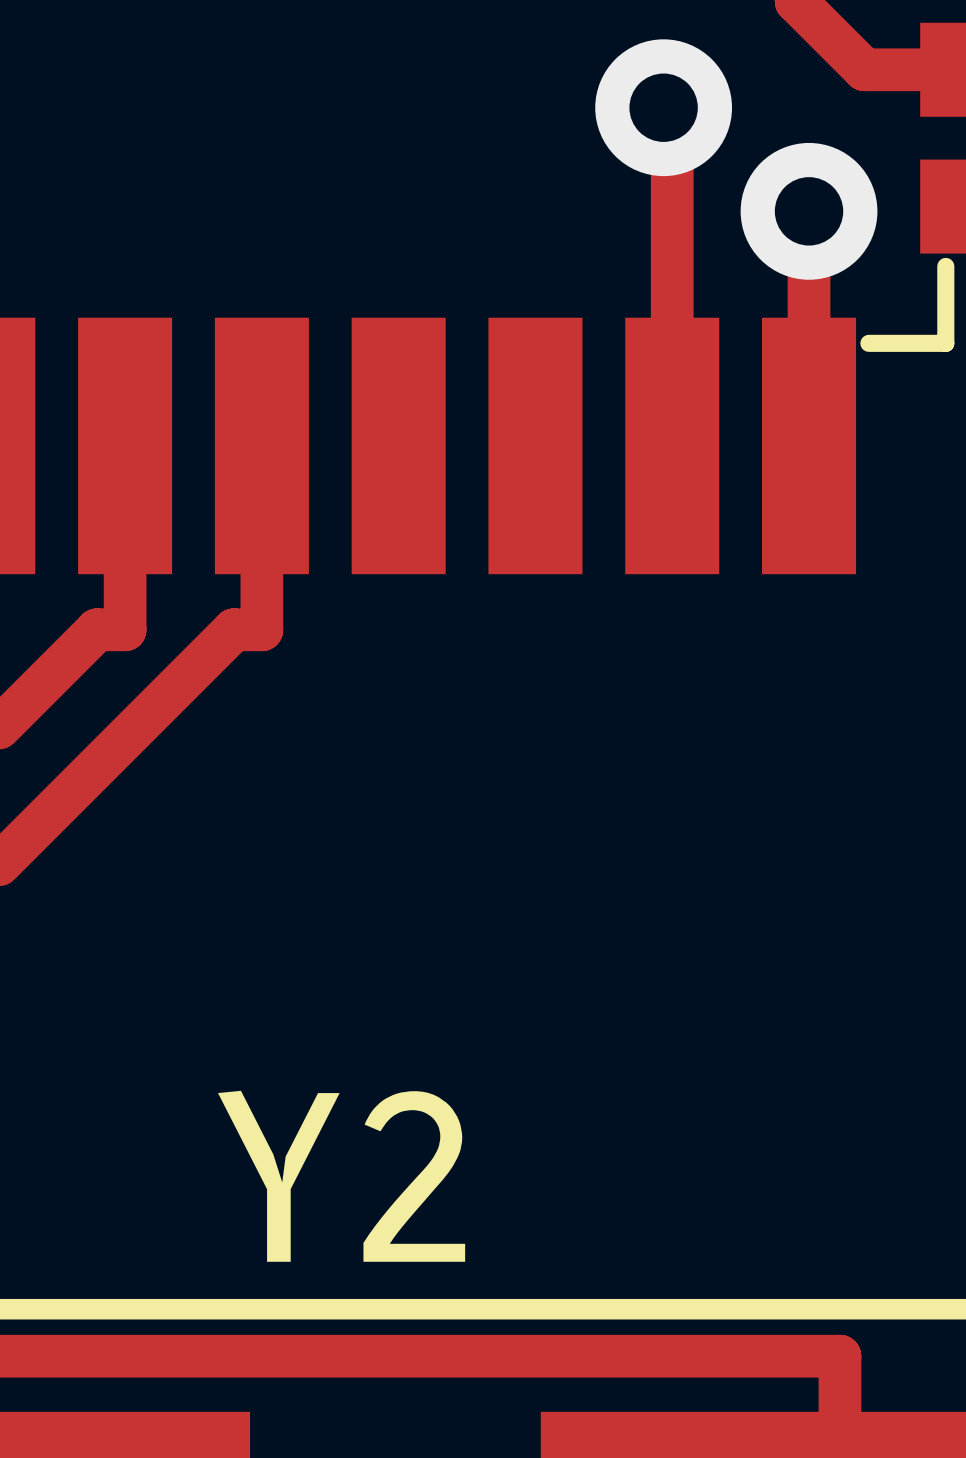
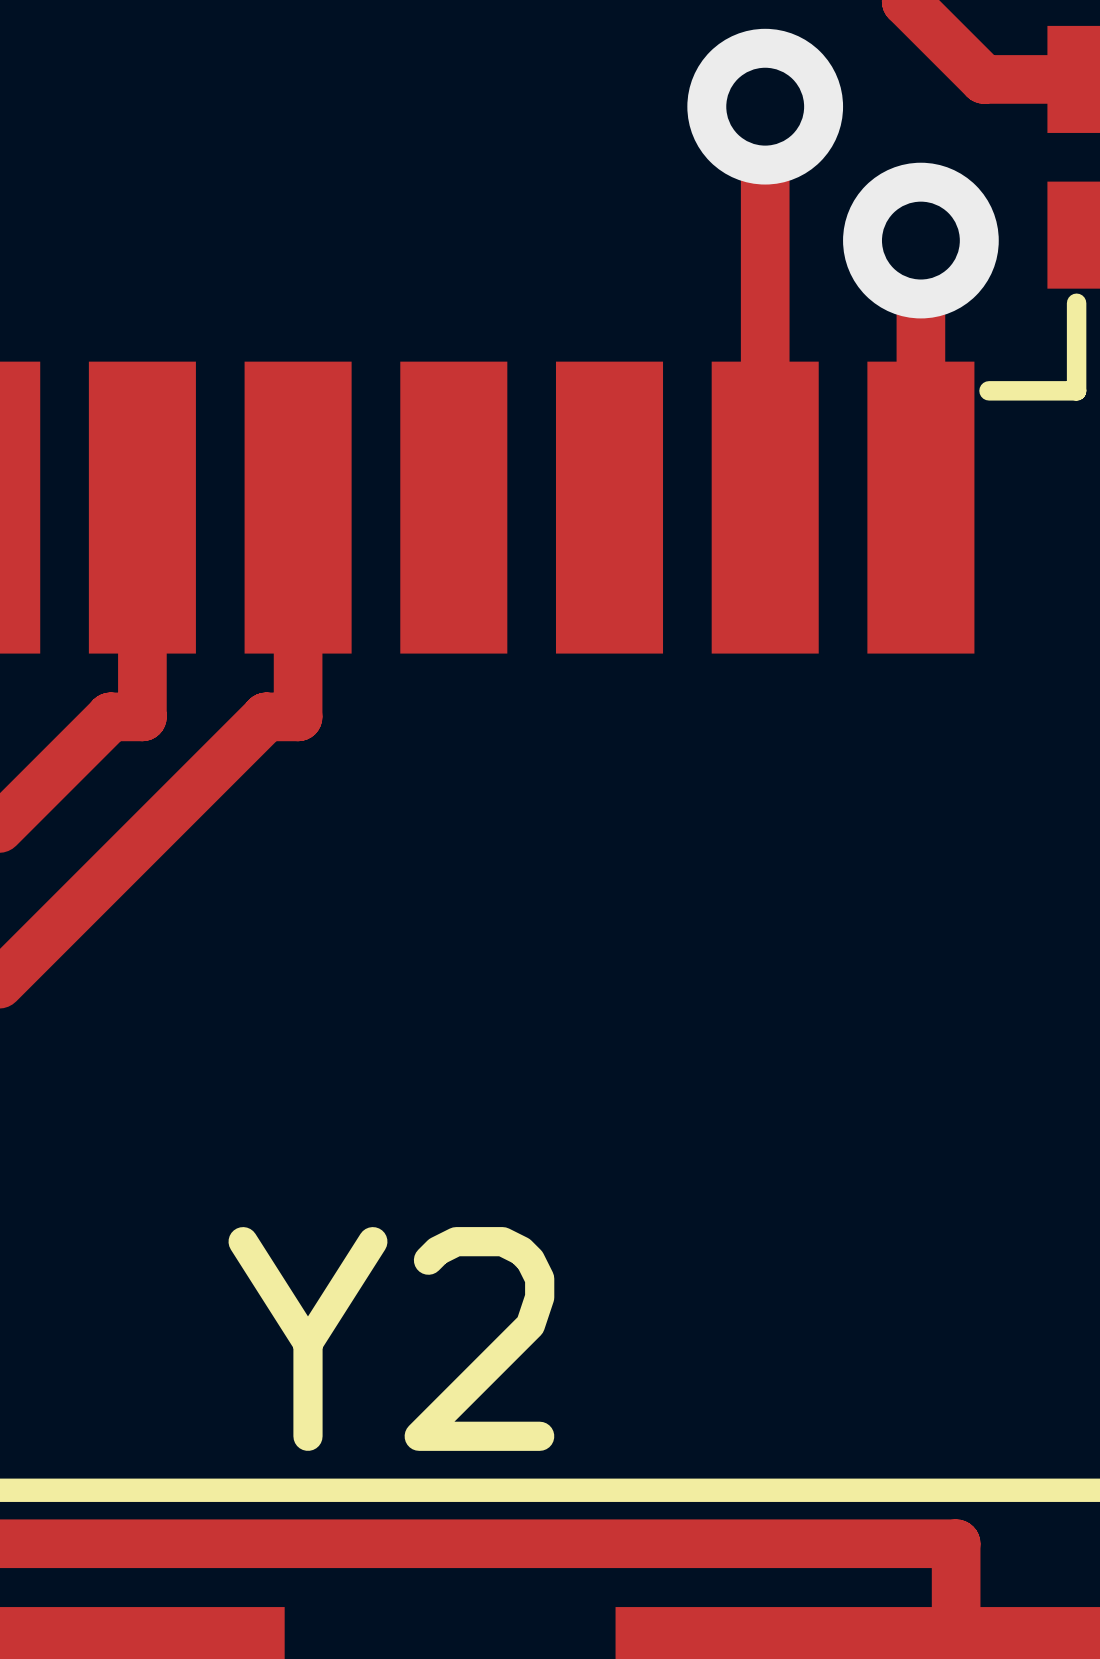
via position: (663, 107) -> (765, 106)

